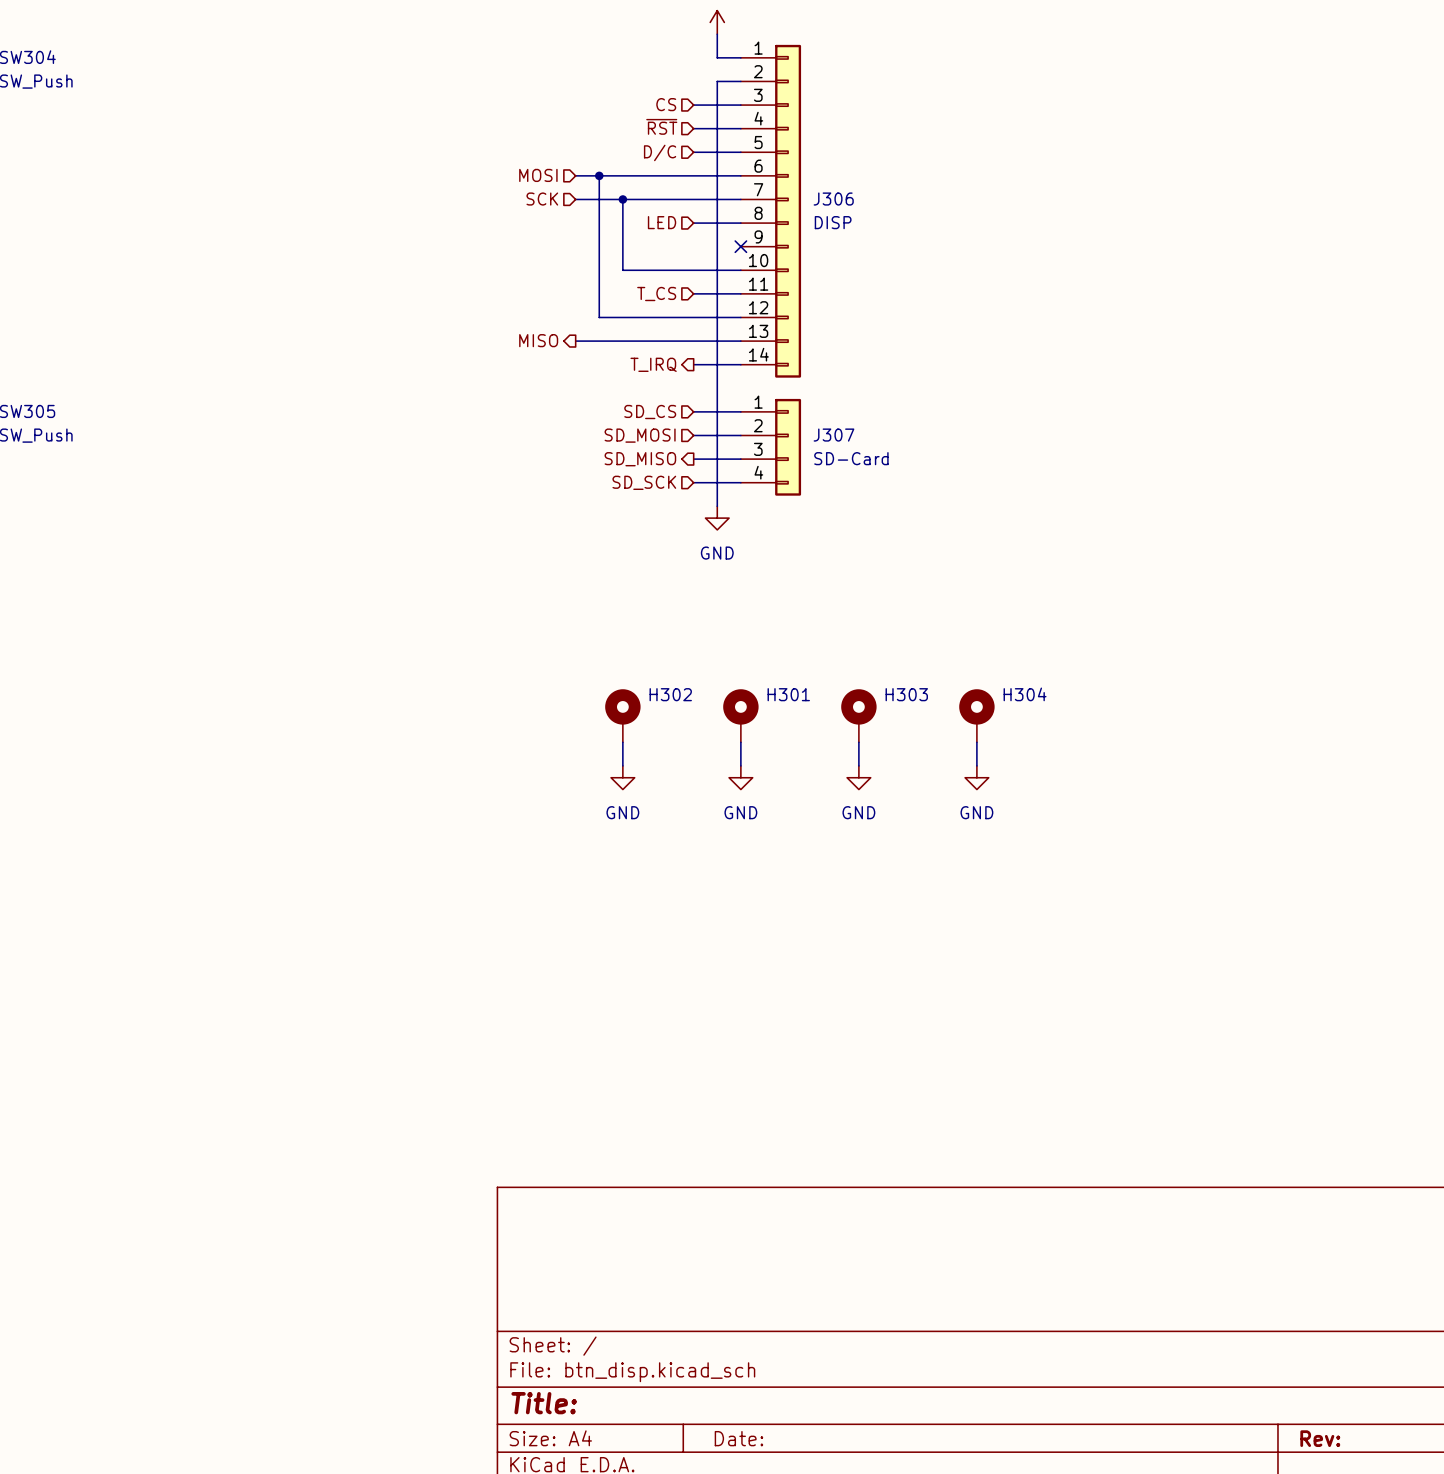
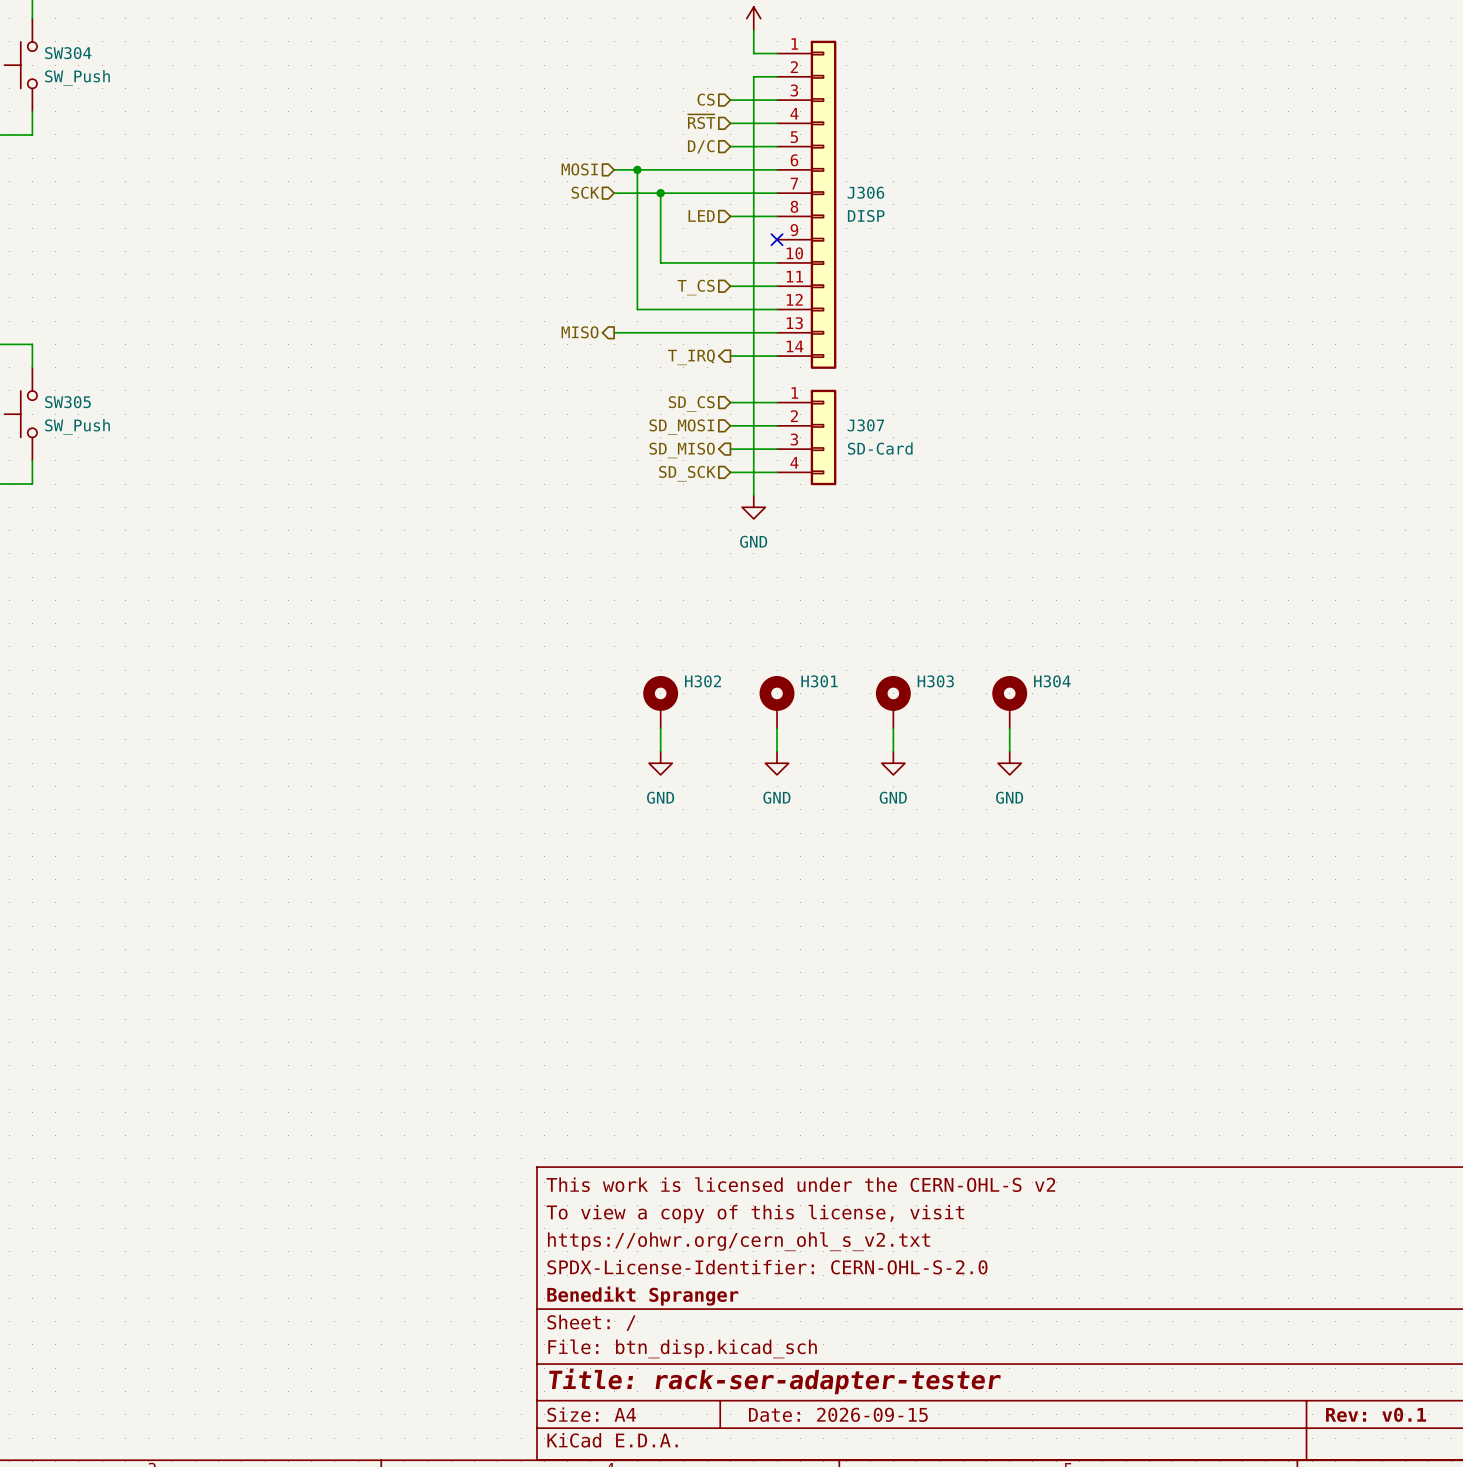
title block: none -> This work is licensed under the CERN-OHL-S v2 (800, 1184)
title block: none -> To view a copy of this license, visit (755, 1213)
title block: none -> https://ohwr.org/cern_ohl_s_v2.txt (739, 1241)
title block: none -> SPDX-License-Identifier: CERN-OHL-S-2.0 (767, 1267)
title block: none -> Benedikt Spranger (642, 1295)
title block: Title: (544, 1403) -> Title: rack-ser-adapter-tester (774, 1381)
title block: Date: (738, 1438) -> Date: 2026-09-15 (838, 1414)
title block: Rev: (1320, 1438) -> Rev: v0.1 (1376, 1414)

